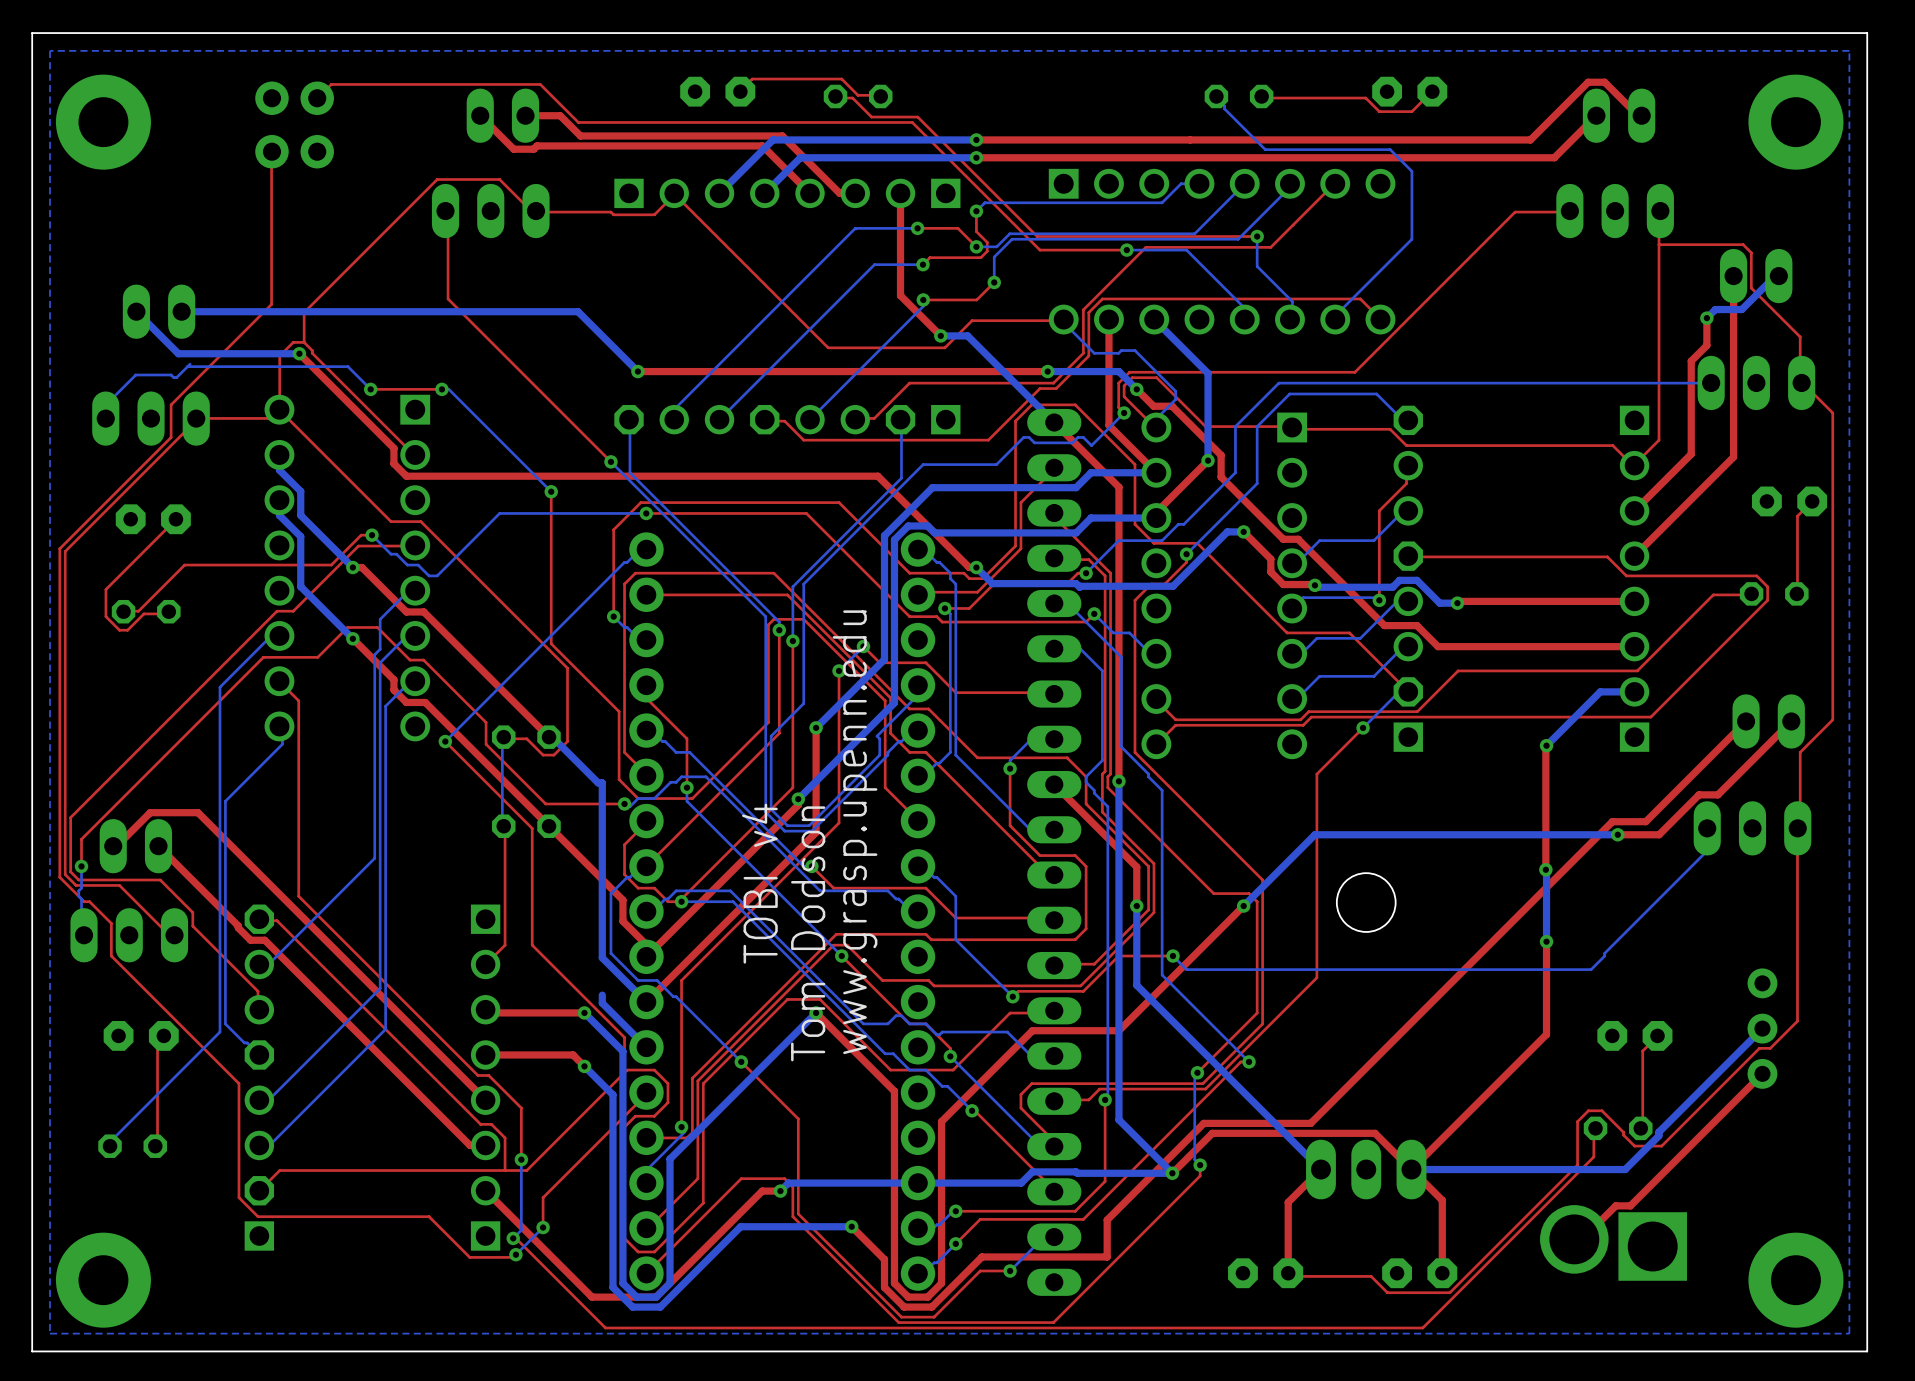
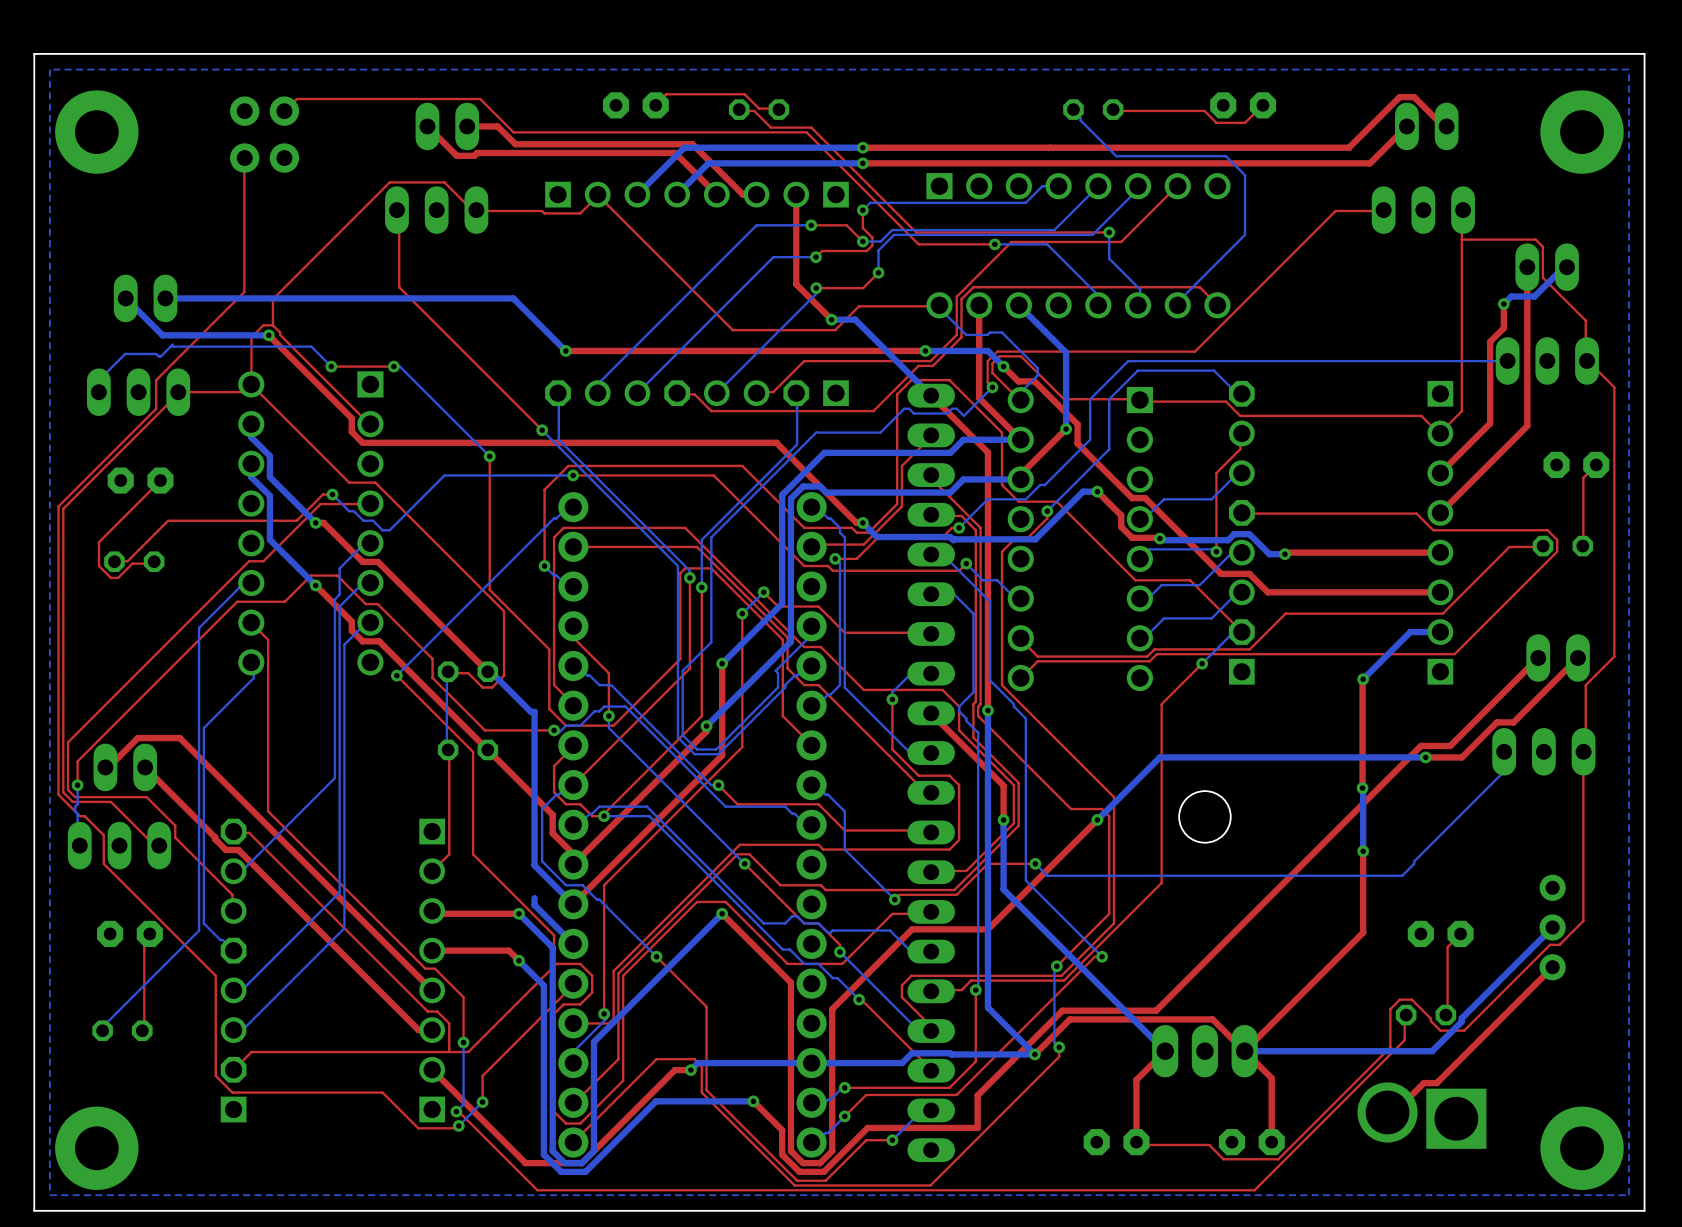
text: www.grasp.upenn.edu (855, 832) -> none
text: TOBI v4 (759, 883) -> none
text: Tom Dodson (808, 933) -> none

